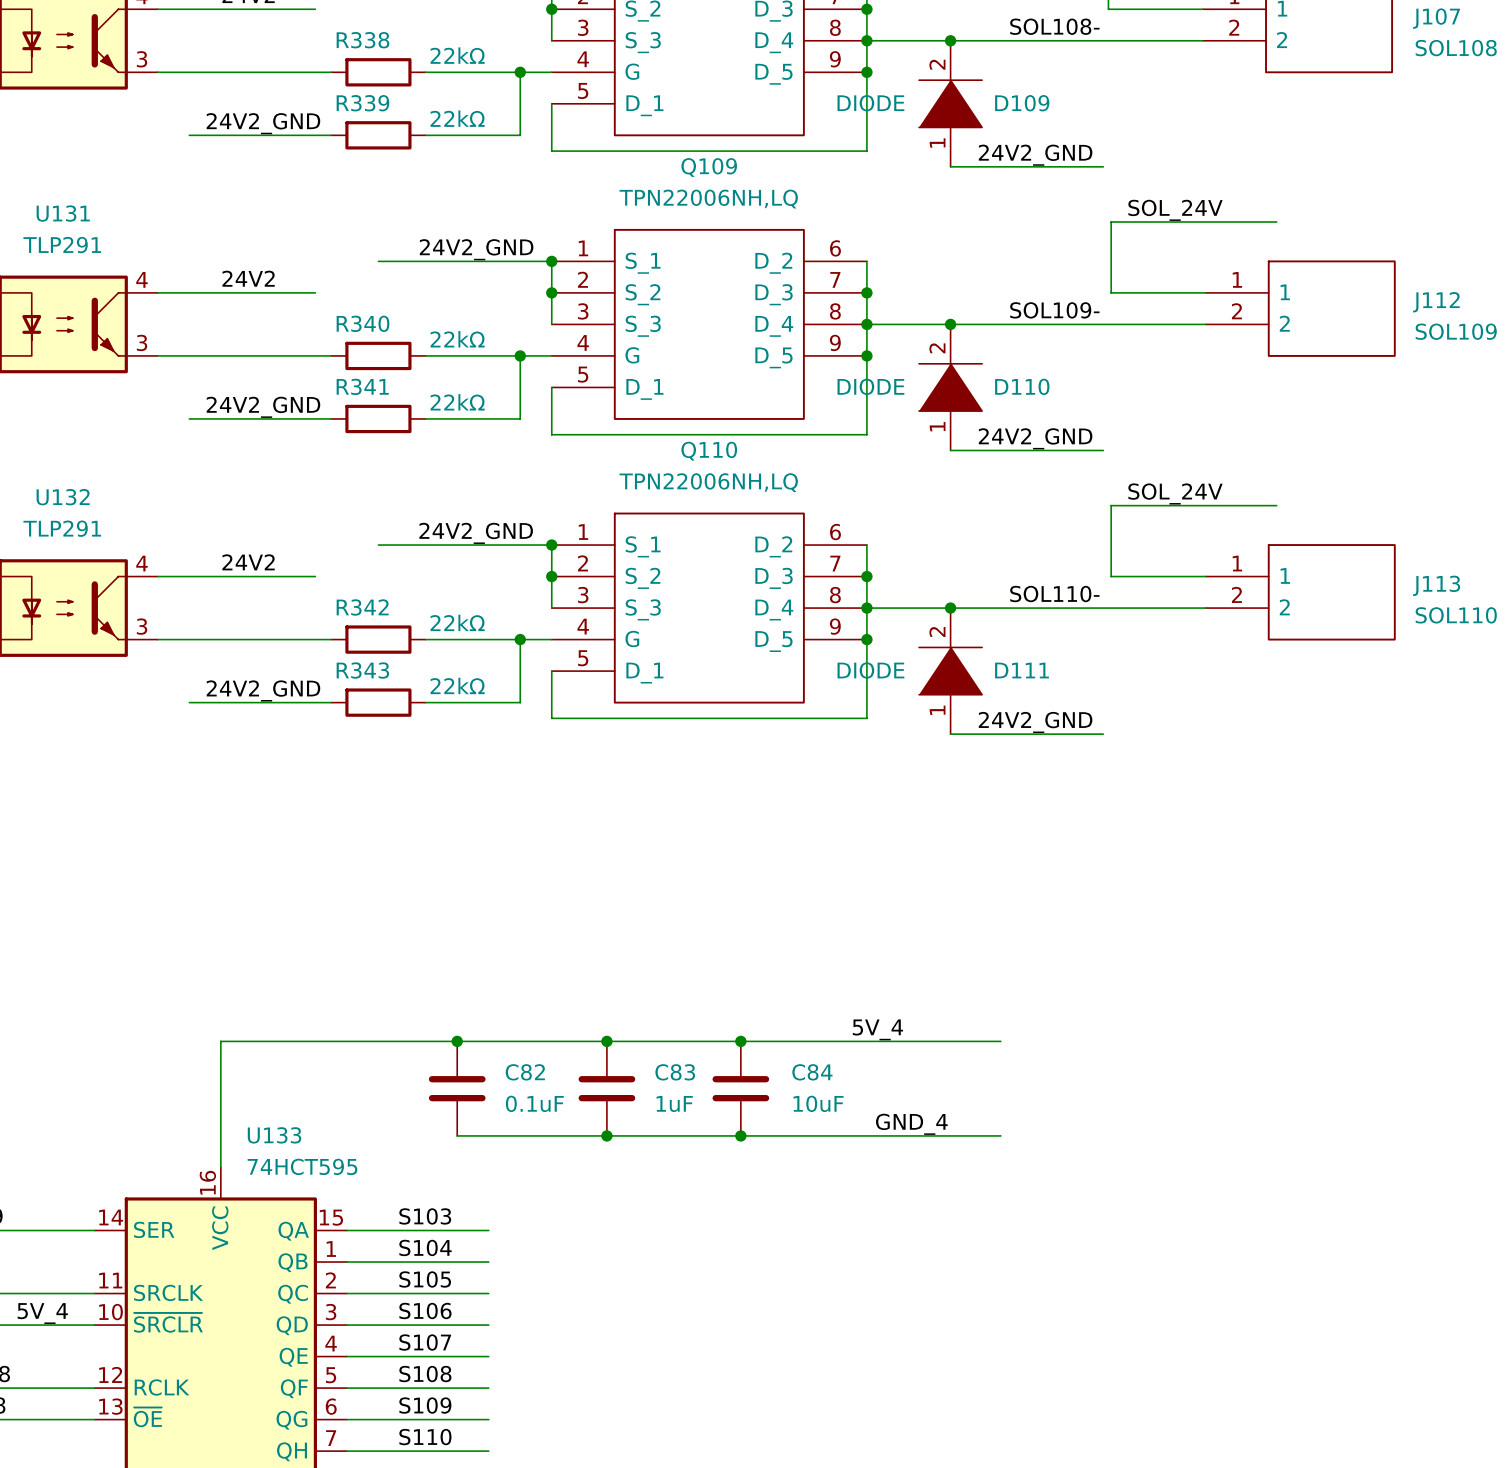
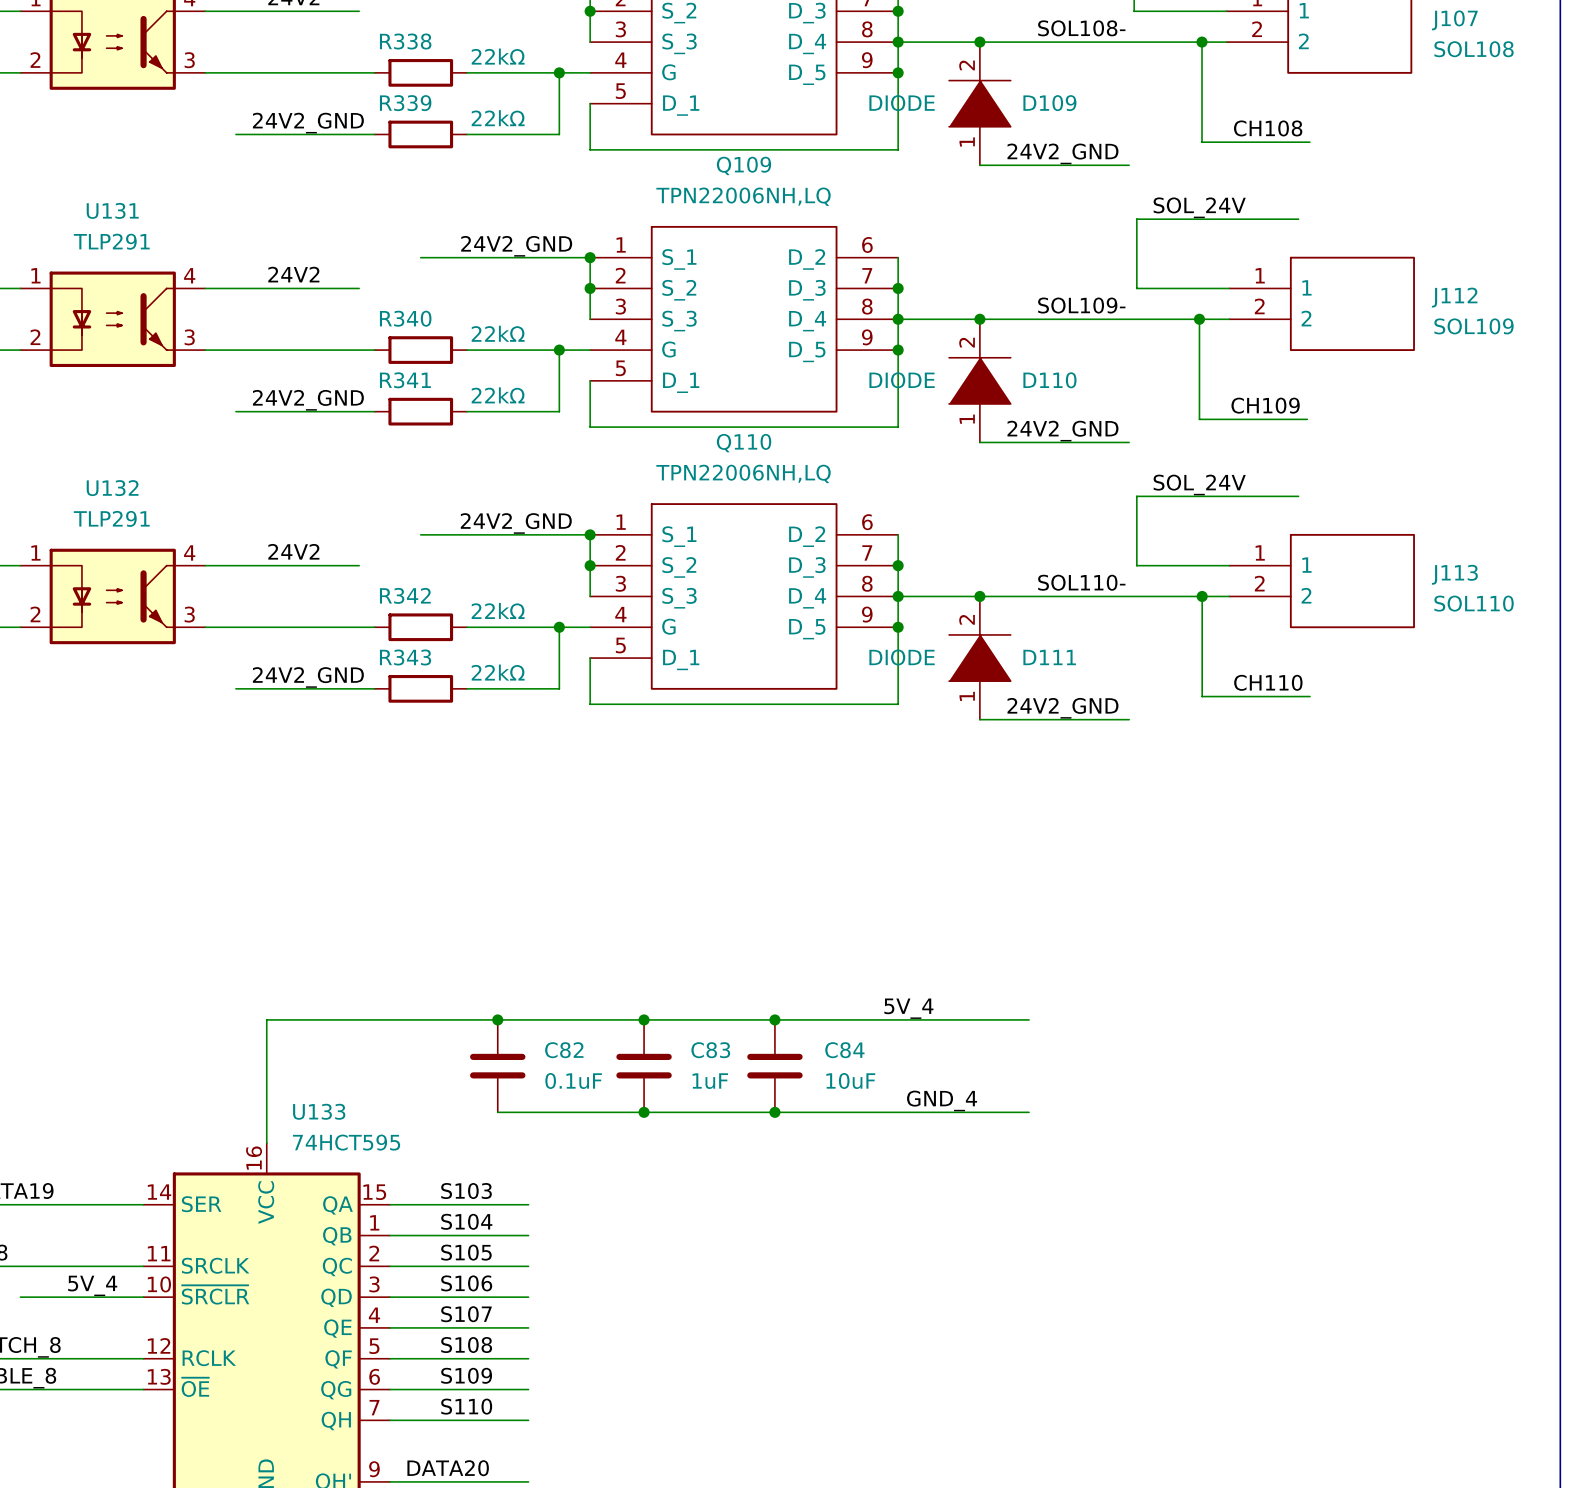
wire: none -> (1202, 42) (1202, 142) (1309, 142)
junction: none -> (1202, 42)
label: none -> CH108 (1268, 128)
wire: none -> (1199, 319) (1199, 419) (1307, 419)
junction: none -> (1199, 319)
label: none -> CH109 (1265, 405)
wire: none -> (1202, 596) (1202, 696) (1309, 696)
junction: none -> (1202, 596)
label: none -> CH110 (1268, 682)

